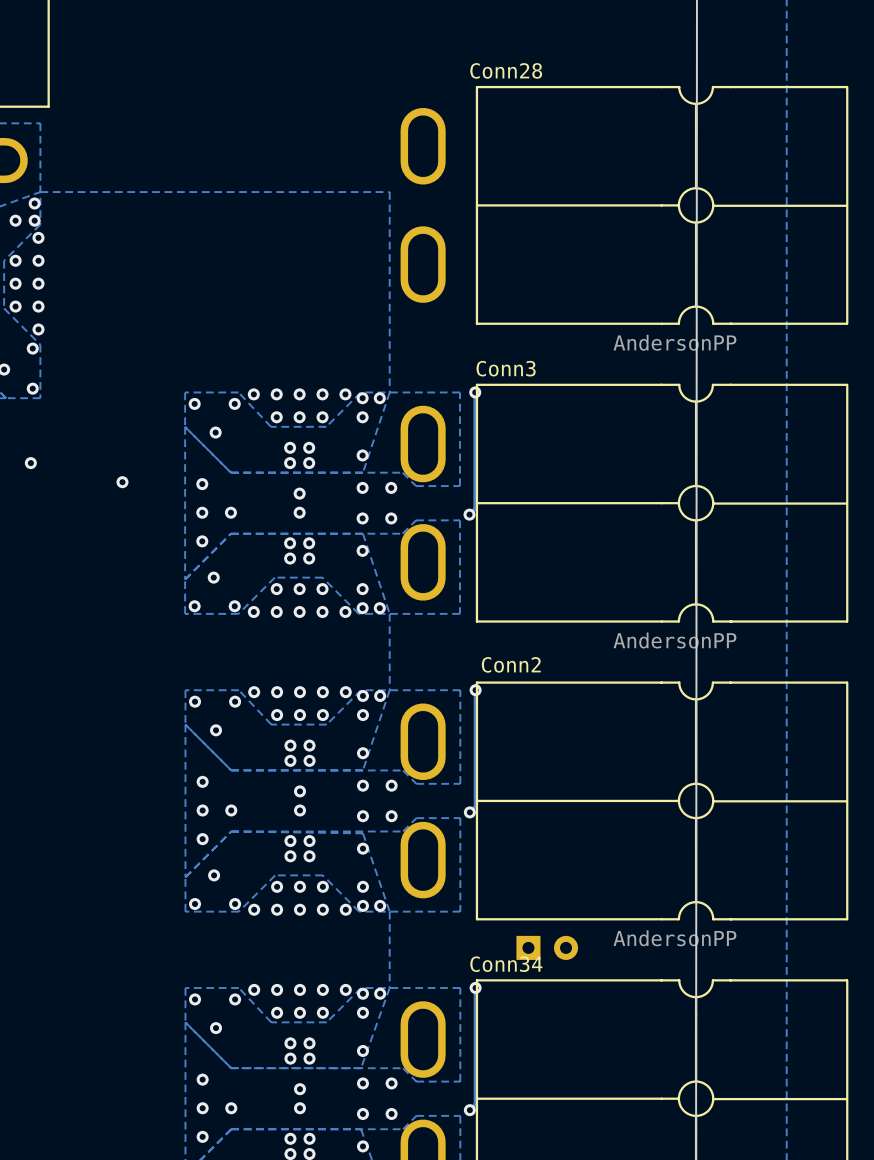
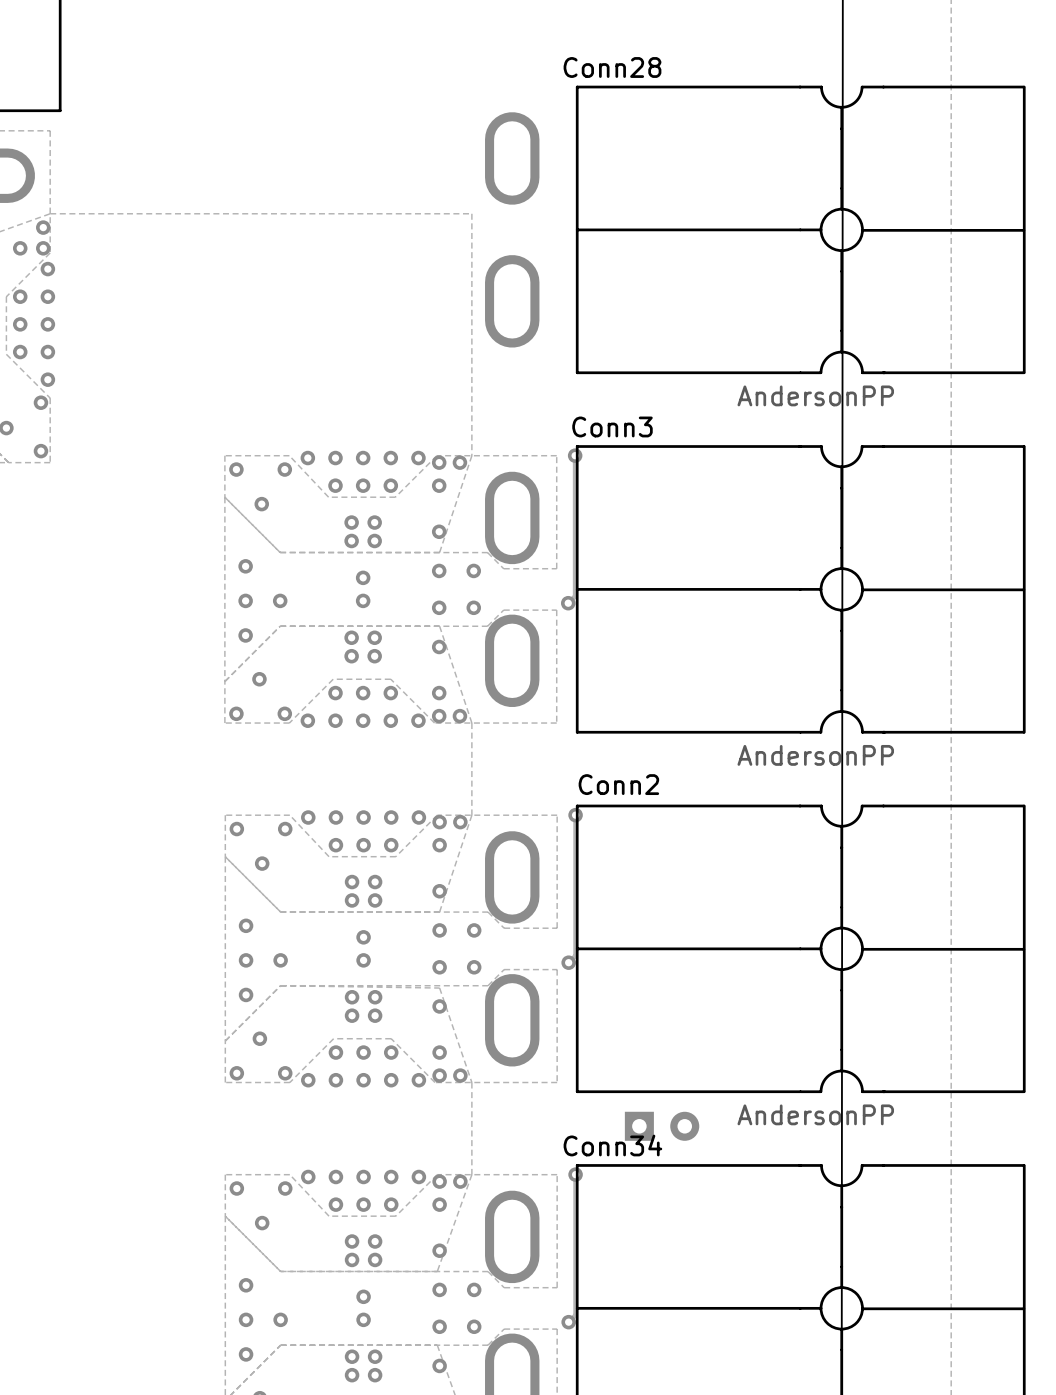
via: (30, 463) -> none
via: (122, 482) -> none

